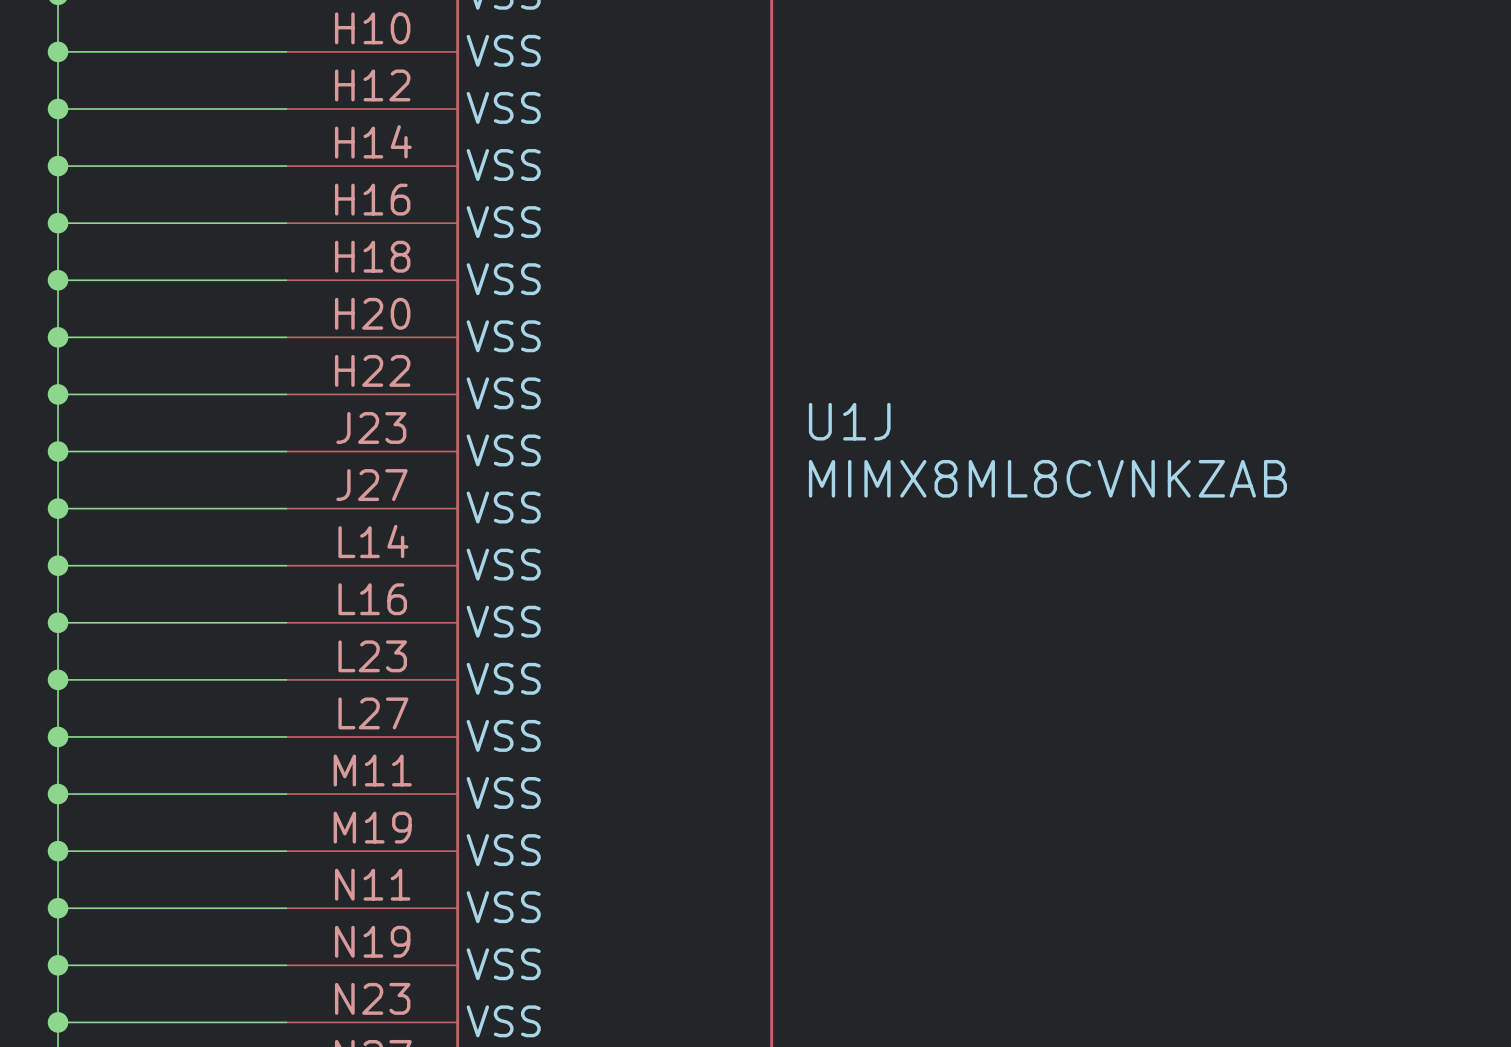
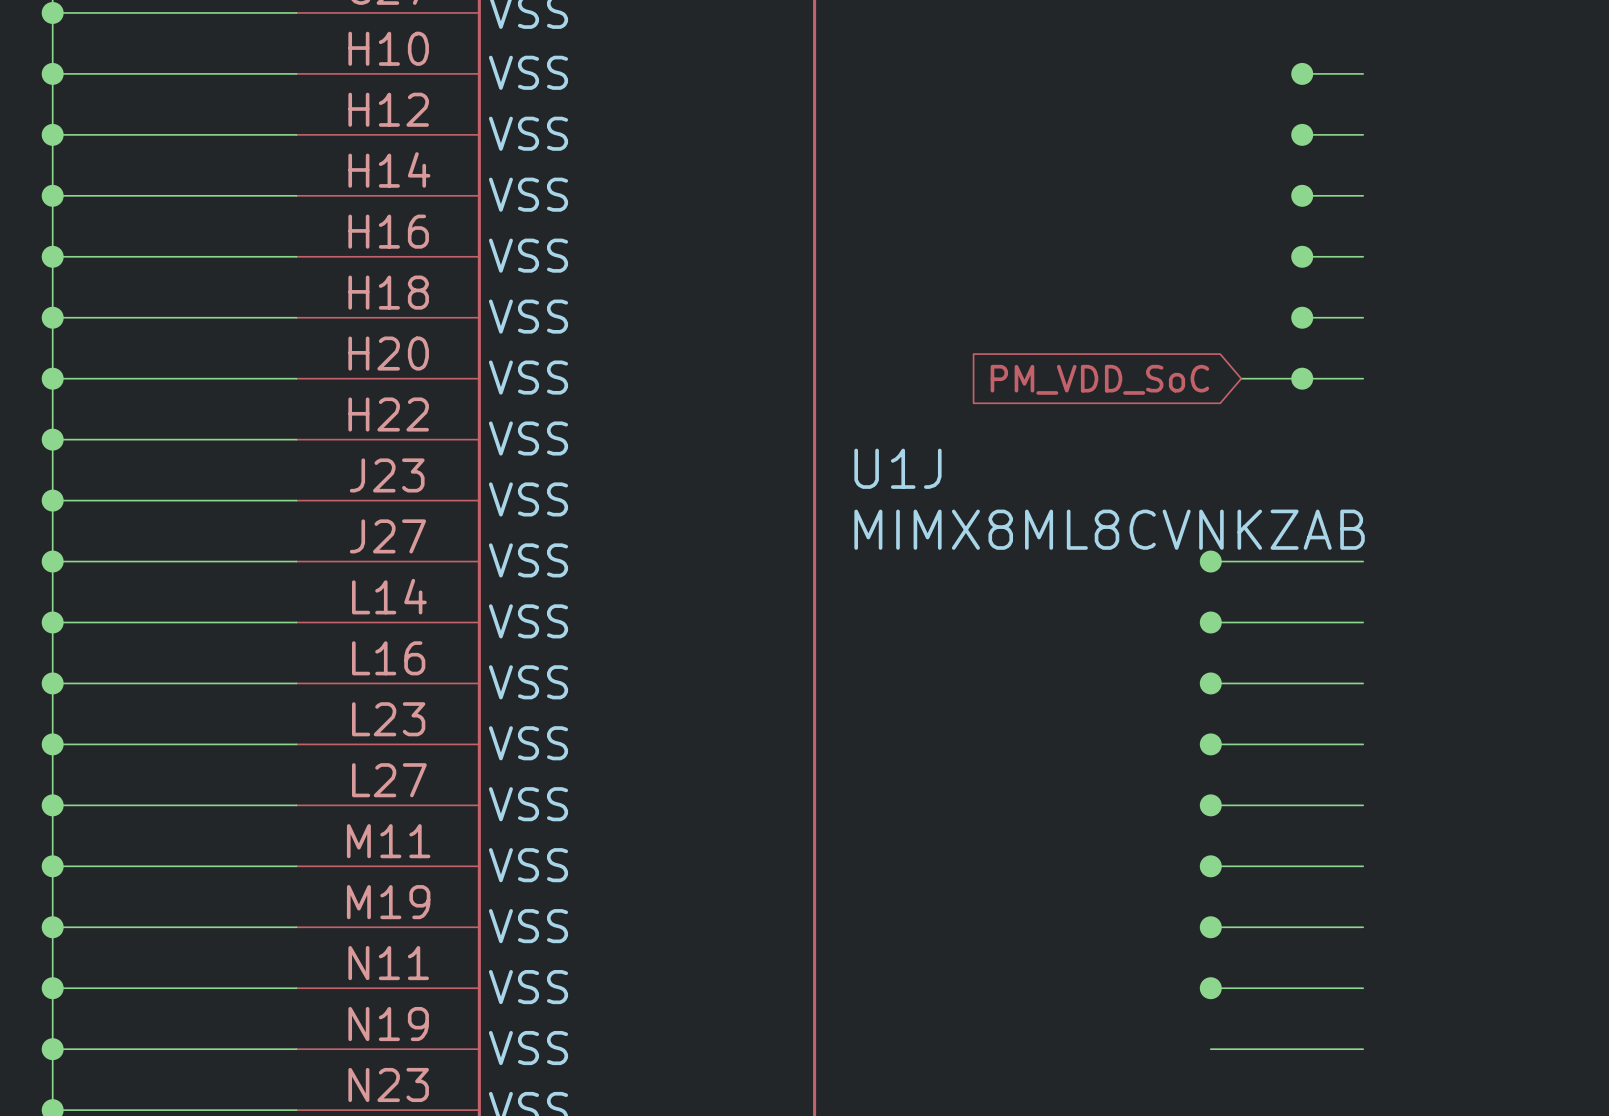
wire: none -> (1302, 73) (1363, 73)
junction: none -> (1302, 73)
wire: none -> (1302, 134) (1363, 134)
junction: none -> (1302, 134)
wire: none -> (1302, 195) (1363, 195)
junction: none -> (1302, 195)
wire: none -> (1302, 256) (1363, 256)
junction: none -> (1302, 256)
wire: none -> (1302, 317) (1363, 317)
junction: none -> (1302, 317)
wire: none -> (1241, 378) (1363, 378)
junction: none -> (1302, 378)
global label: none -> PM_VDD_SoC (1099, 379)
wire: none -> (1210, 561) (1363, 561)
junction: none -> (1210, 561)
wire: none -> (1210, 622) (1363, 622)
junction: none -> (1210, 622)
wire: none -> (1210, 683) (1363, 683)
junction: none -> (1210, 683)
wire: none -> (1210, 744) (1363, 744)
junction: none -> (1210, 744)
wire: none -> (1210, 805) (1363, 805)
junction: none -> (1210, 805)
wire: none -> (1210, 866) (1363, 866)
junction: none -> (1210, 866)
wire: none -> (1210, 927) (1363, 927)
junction: none -> (1210, 927)
wire: none -> (1210, 988) (1363, 988)
junction: none -> (1210, 988)
wire: none -> (1210, 1049) (1363, 1049)

